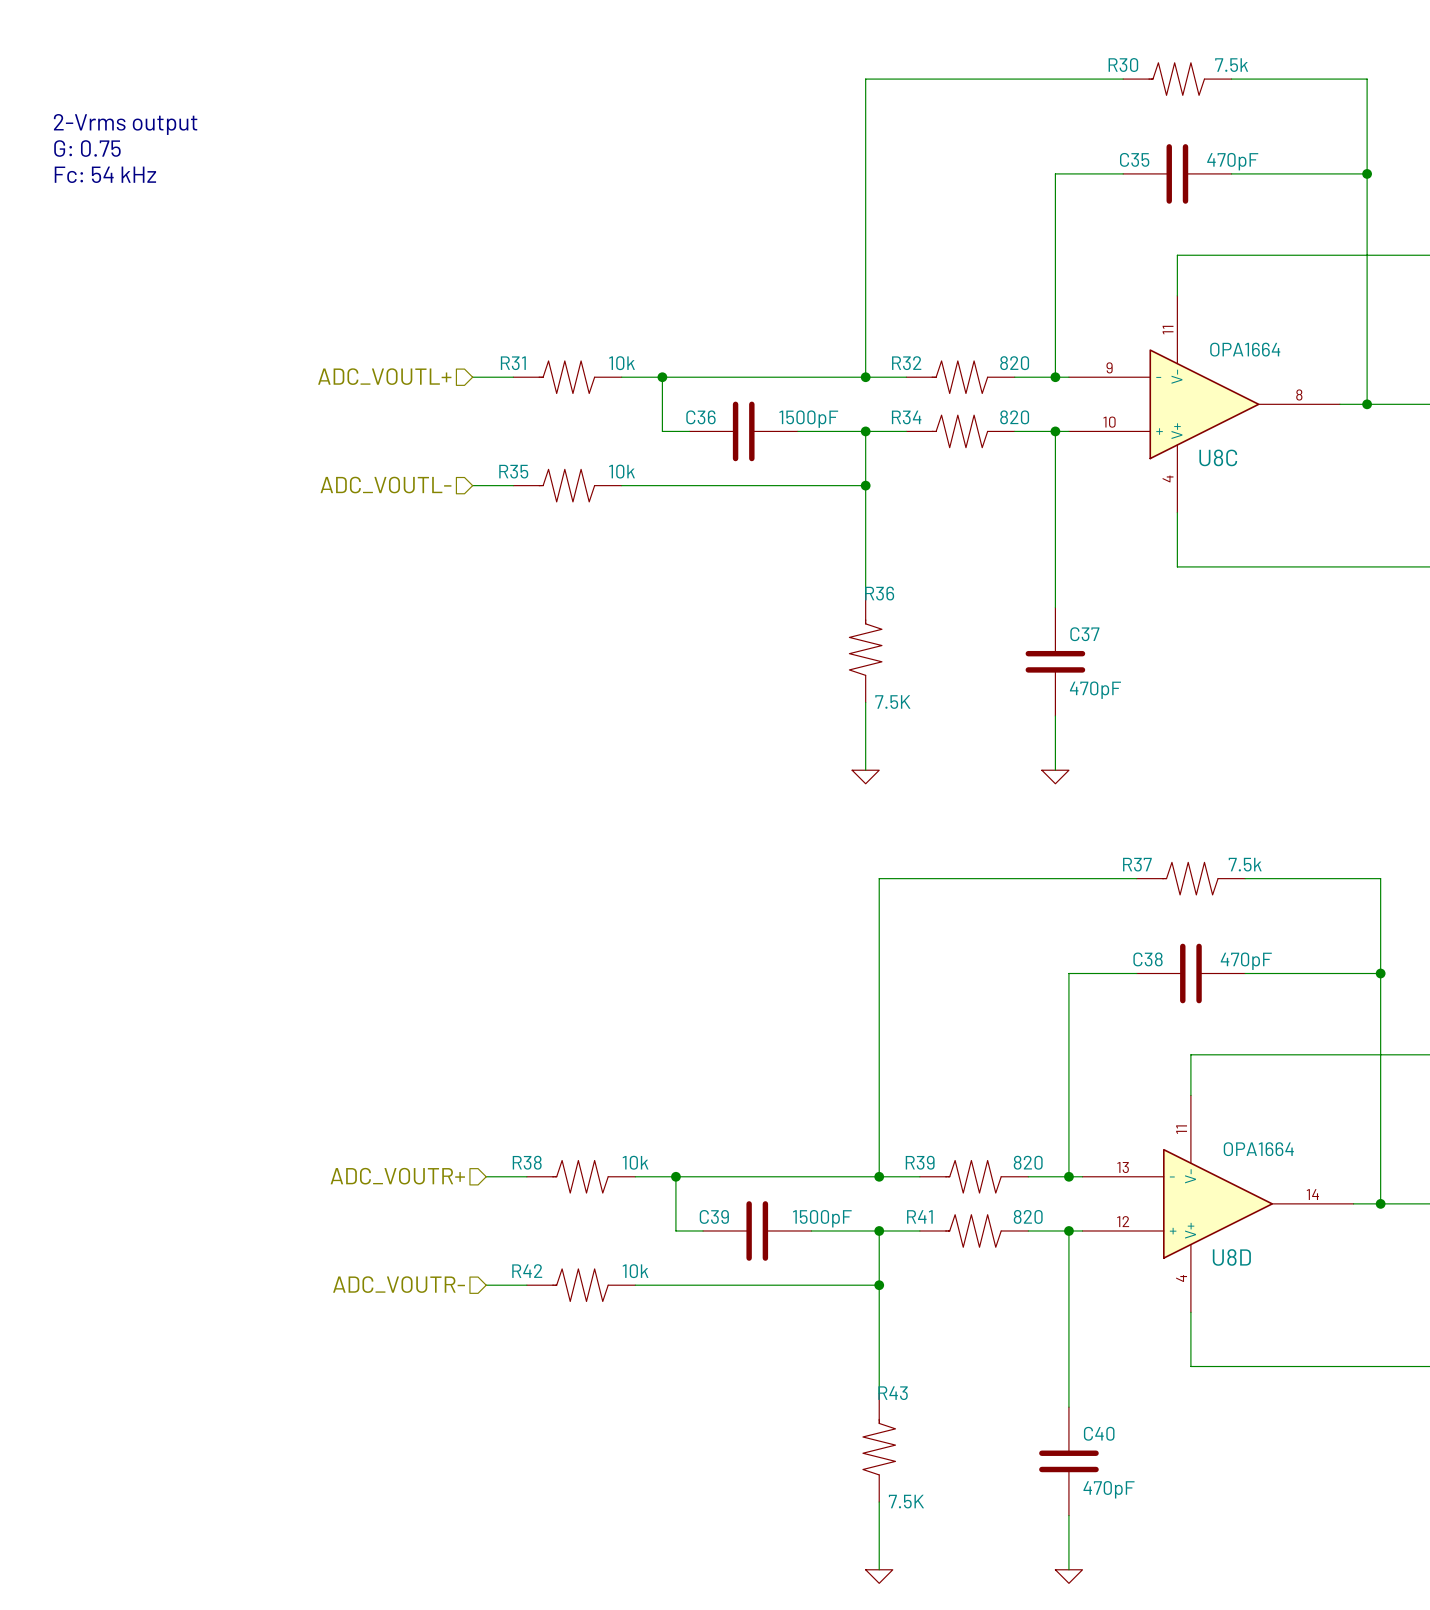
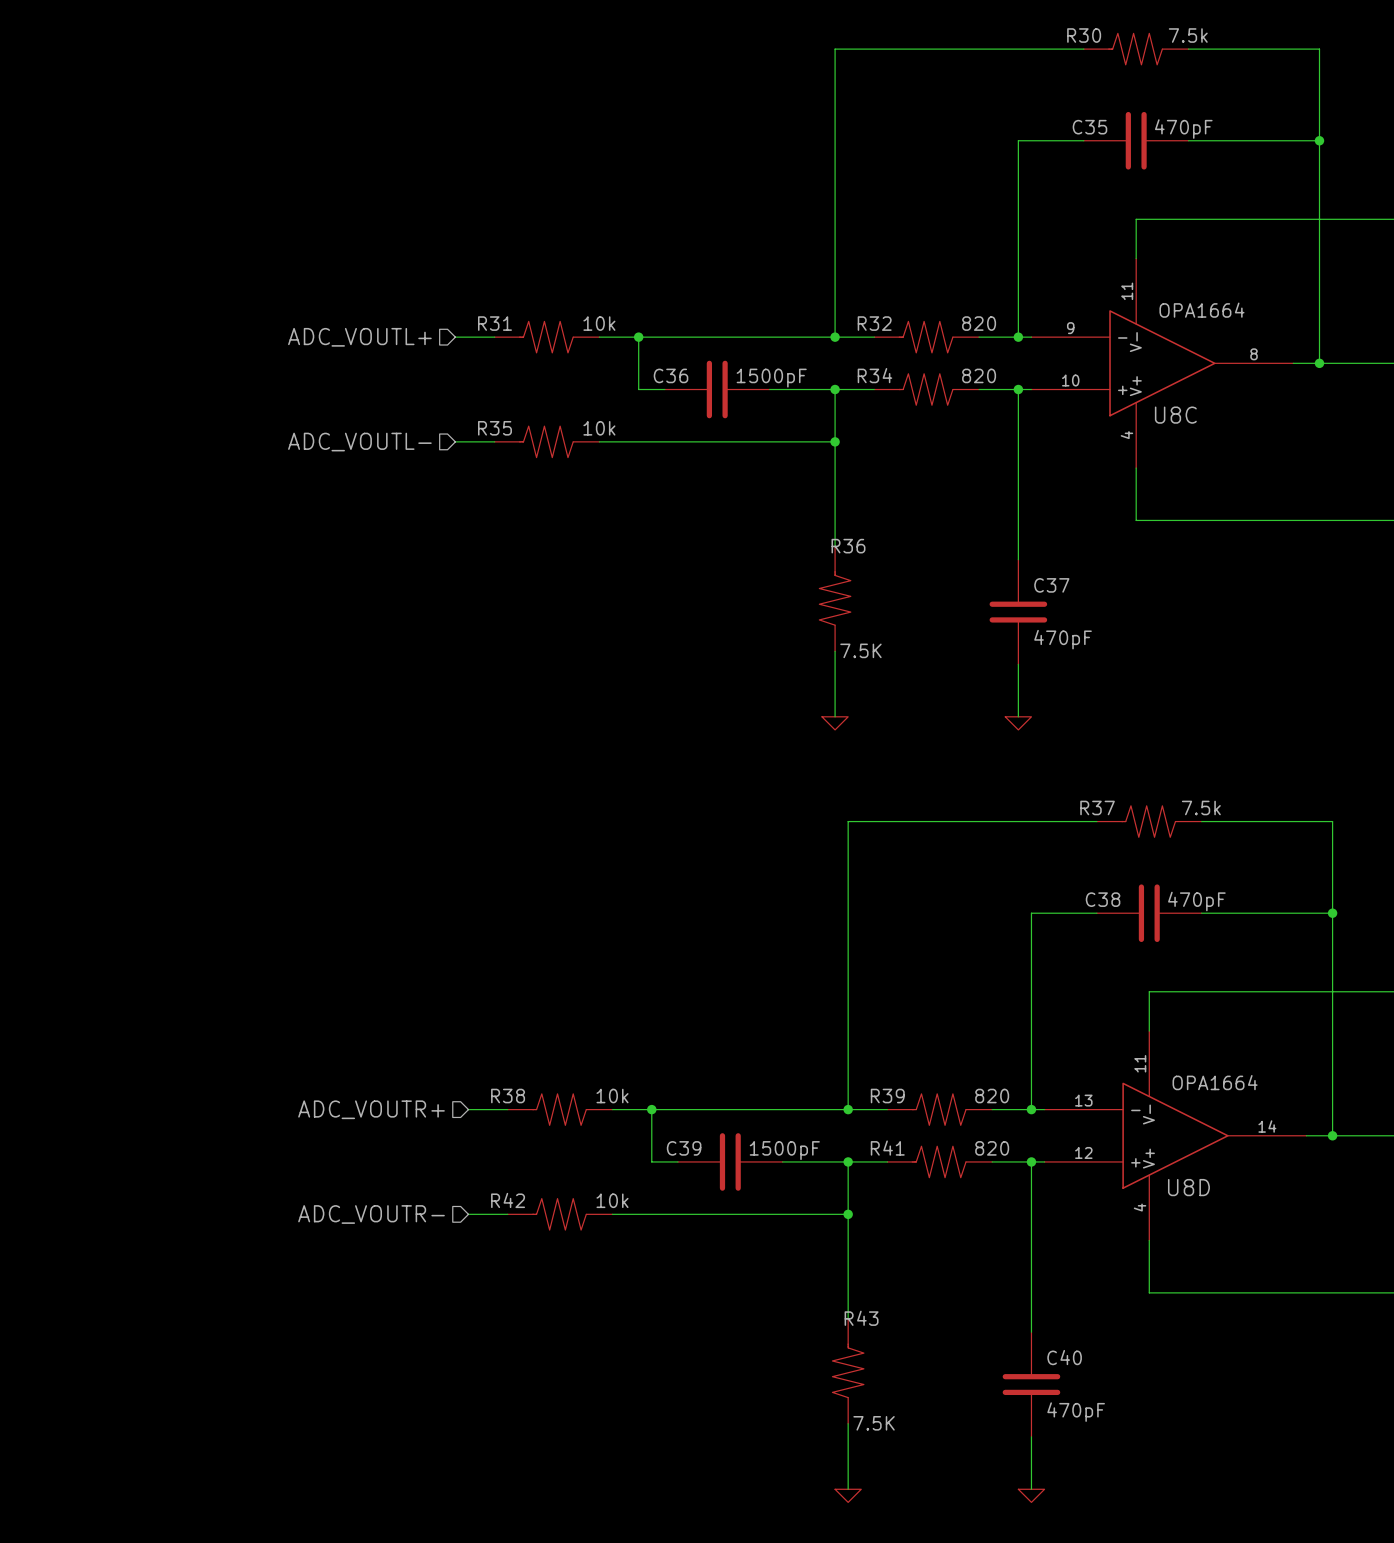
text: 2-Vrms output (125, 124) -> none
text: G: 0.75 (87, 148) -> none
text: Fc: 54 kHz (105, 174) -> none

